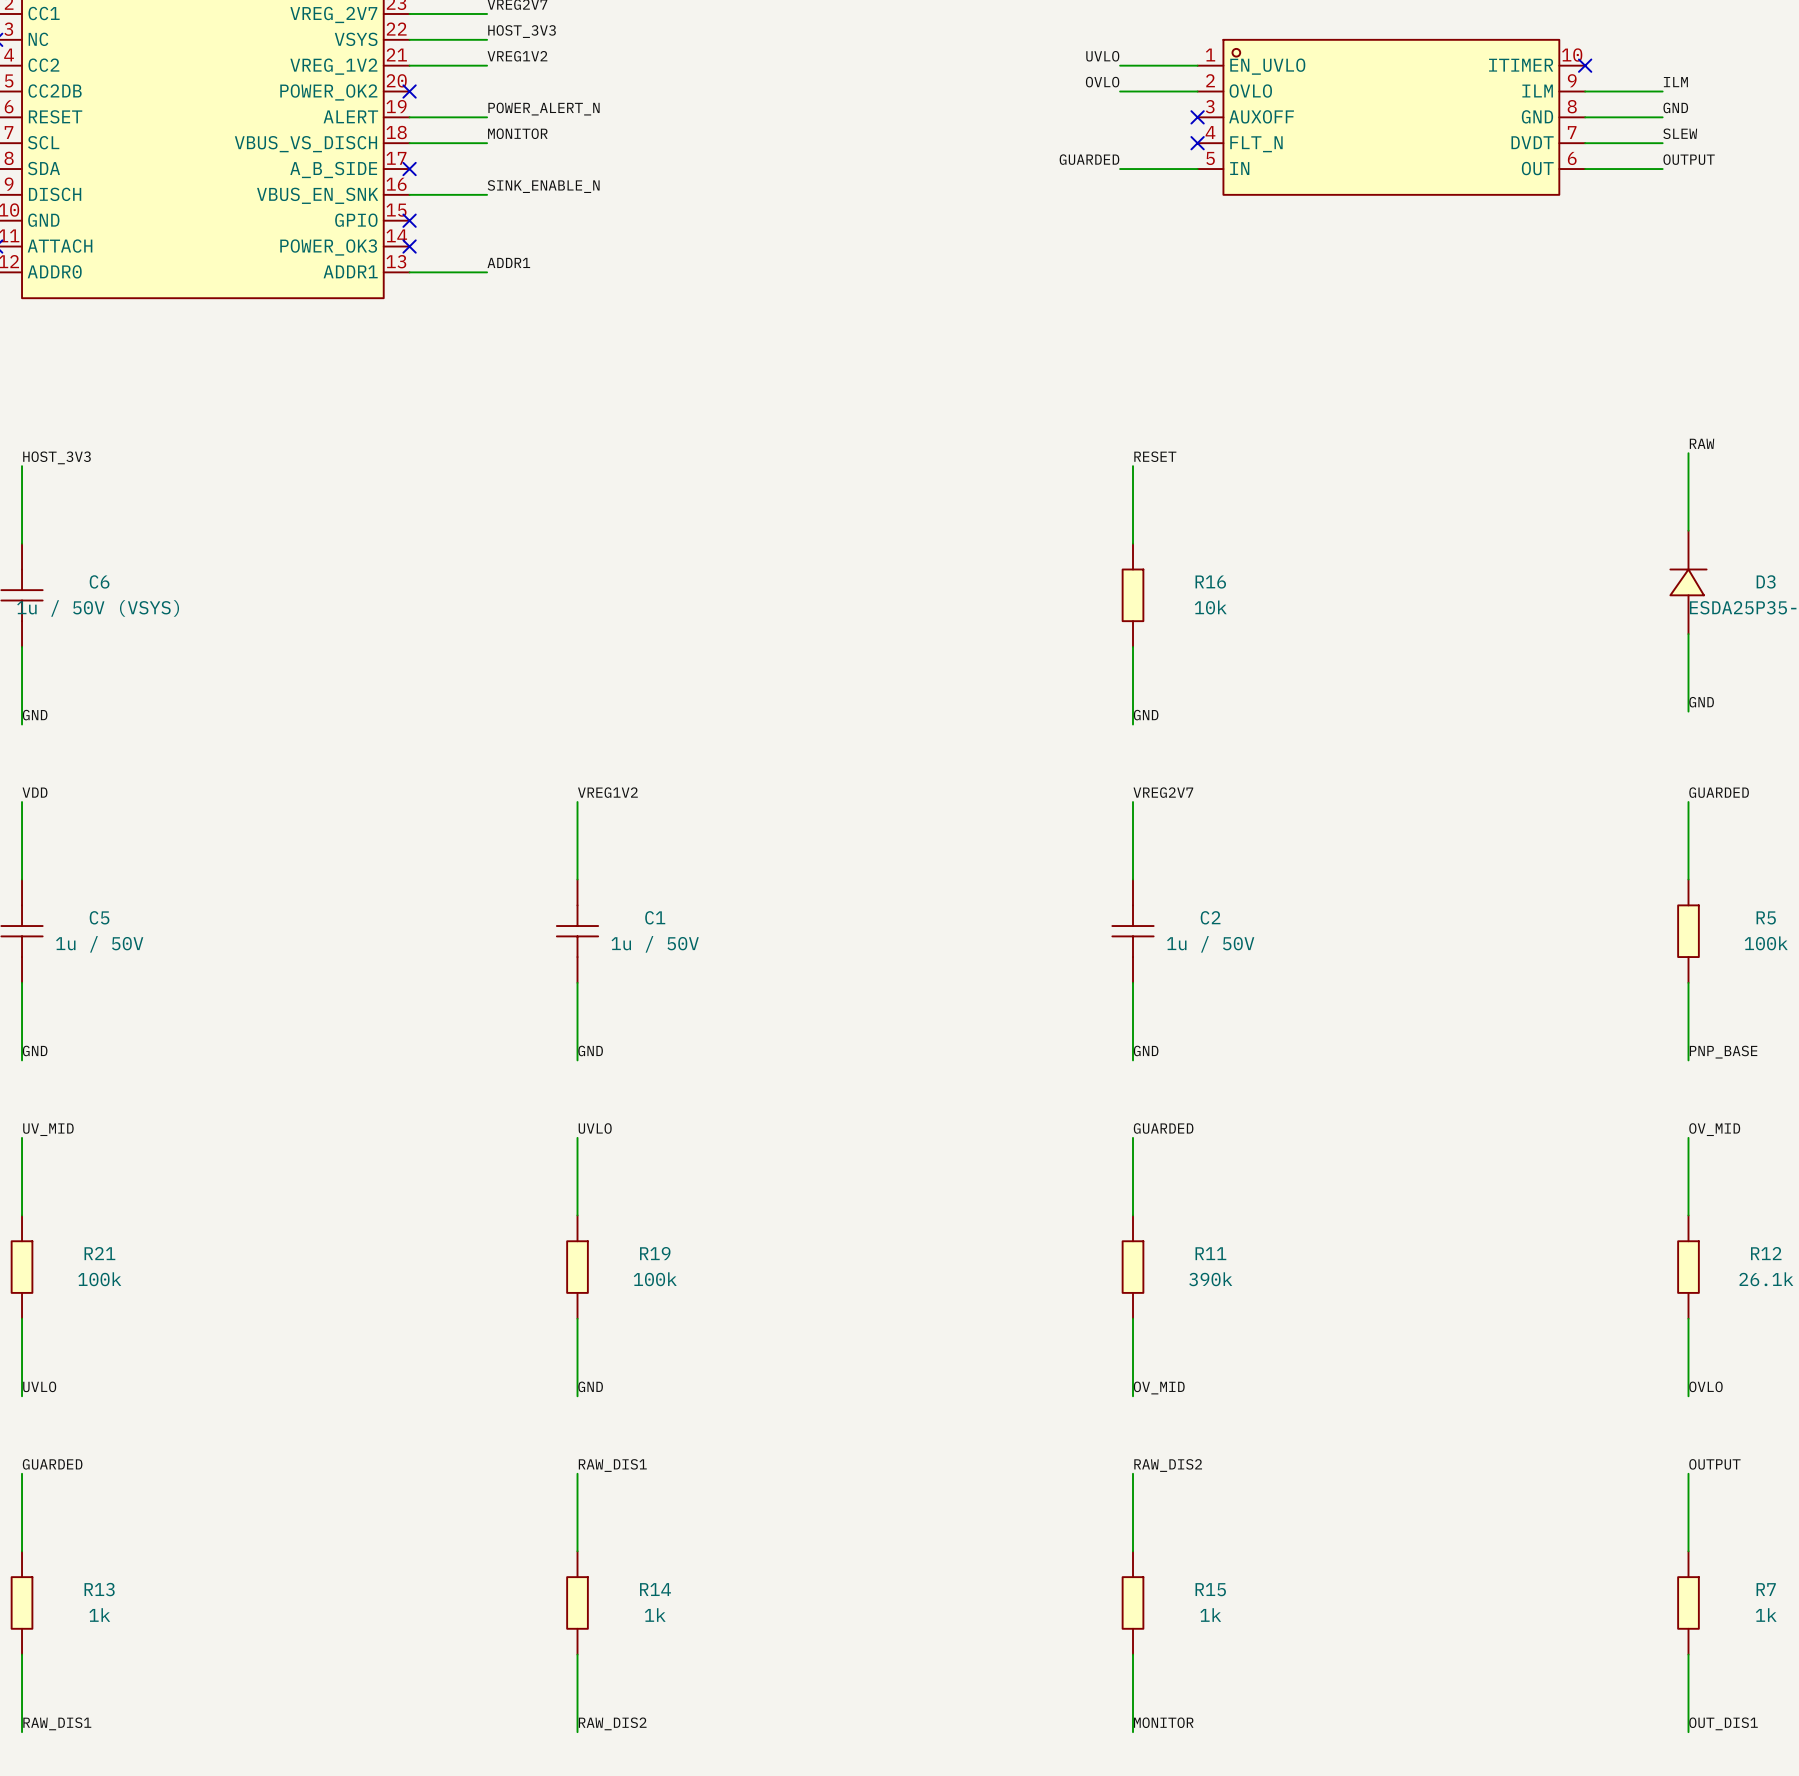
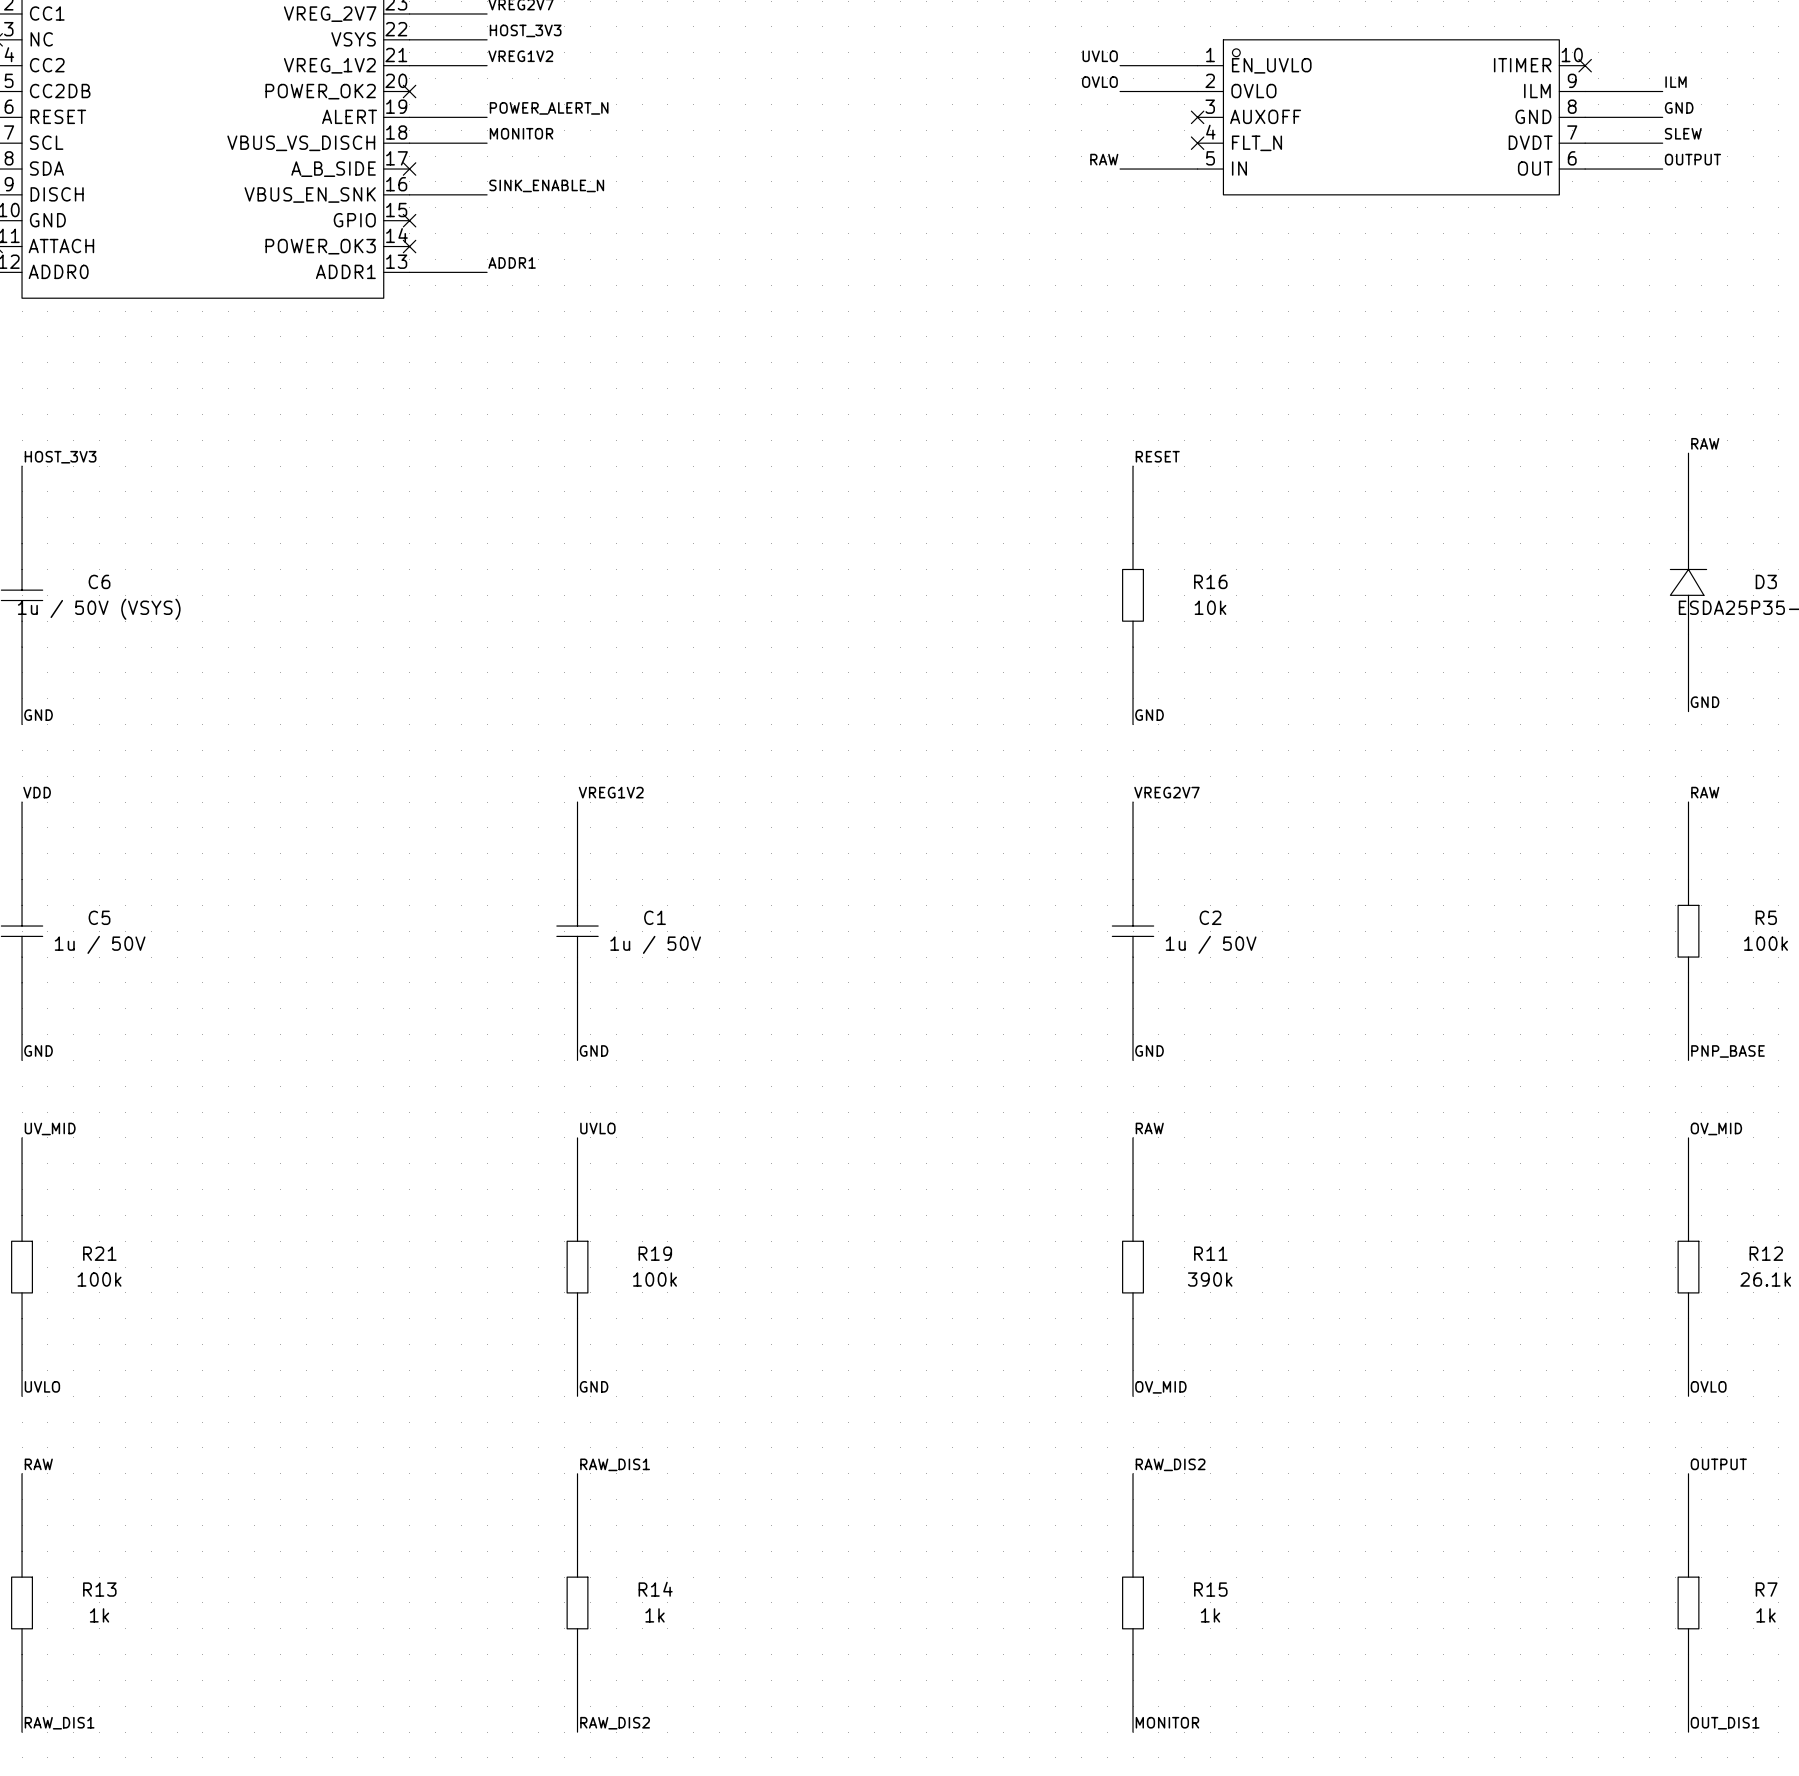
label: GUARDED (1089, 159) -> RAW (1104, 159)
label: GUARDED (1719, 792) -> RAW (1705, 792)
label: GUARDED (1163, 1128) -> RAW (1149, 1128)
label: GUARDED (52, 1464) -> RAW (38, 1464)

